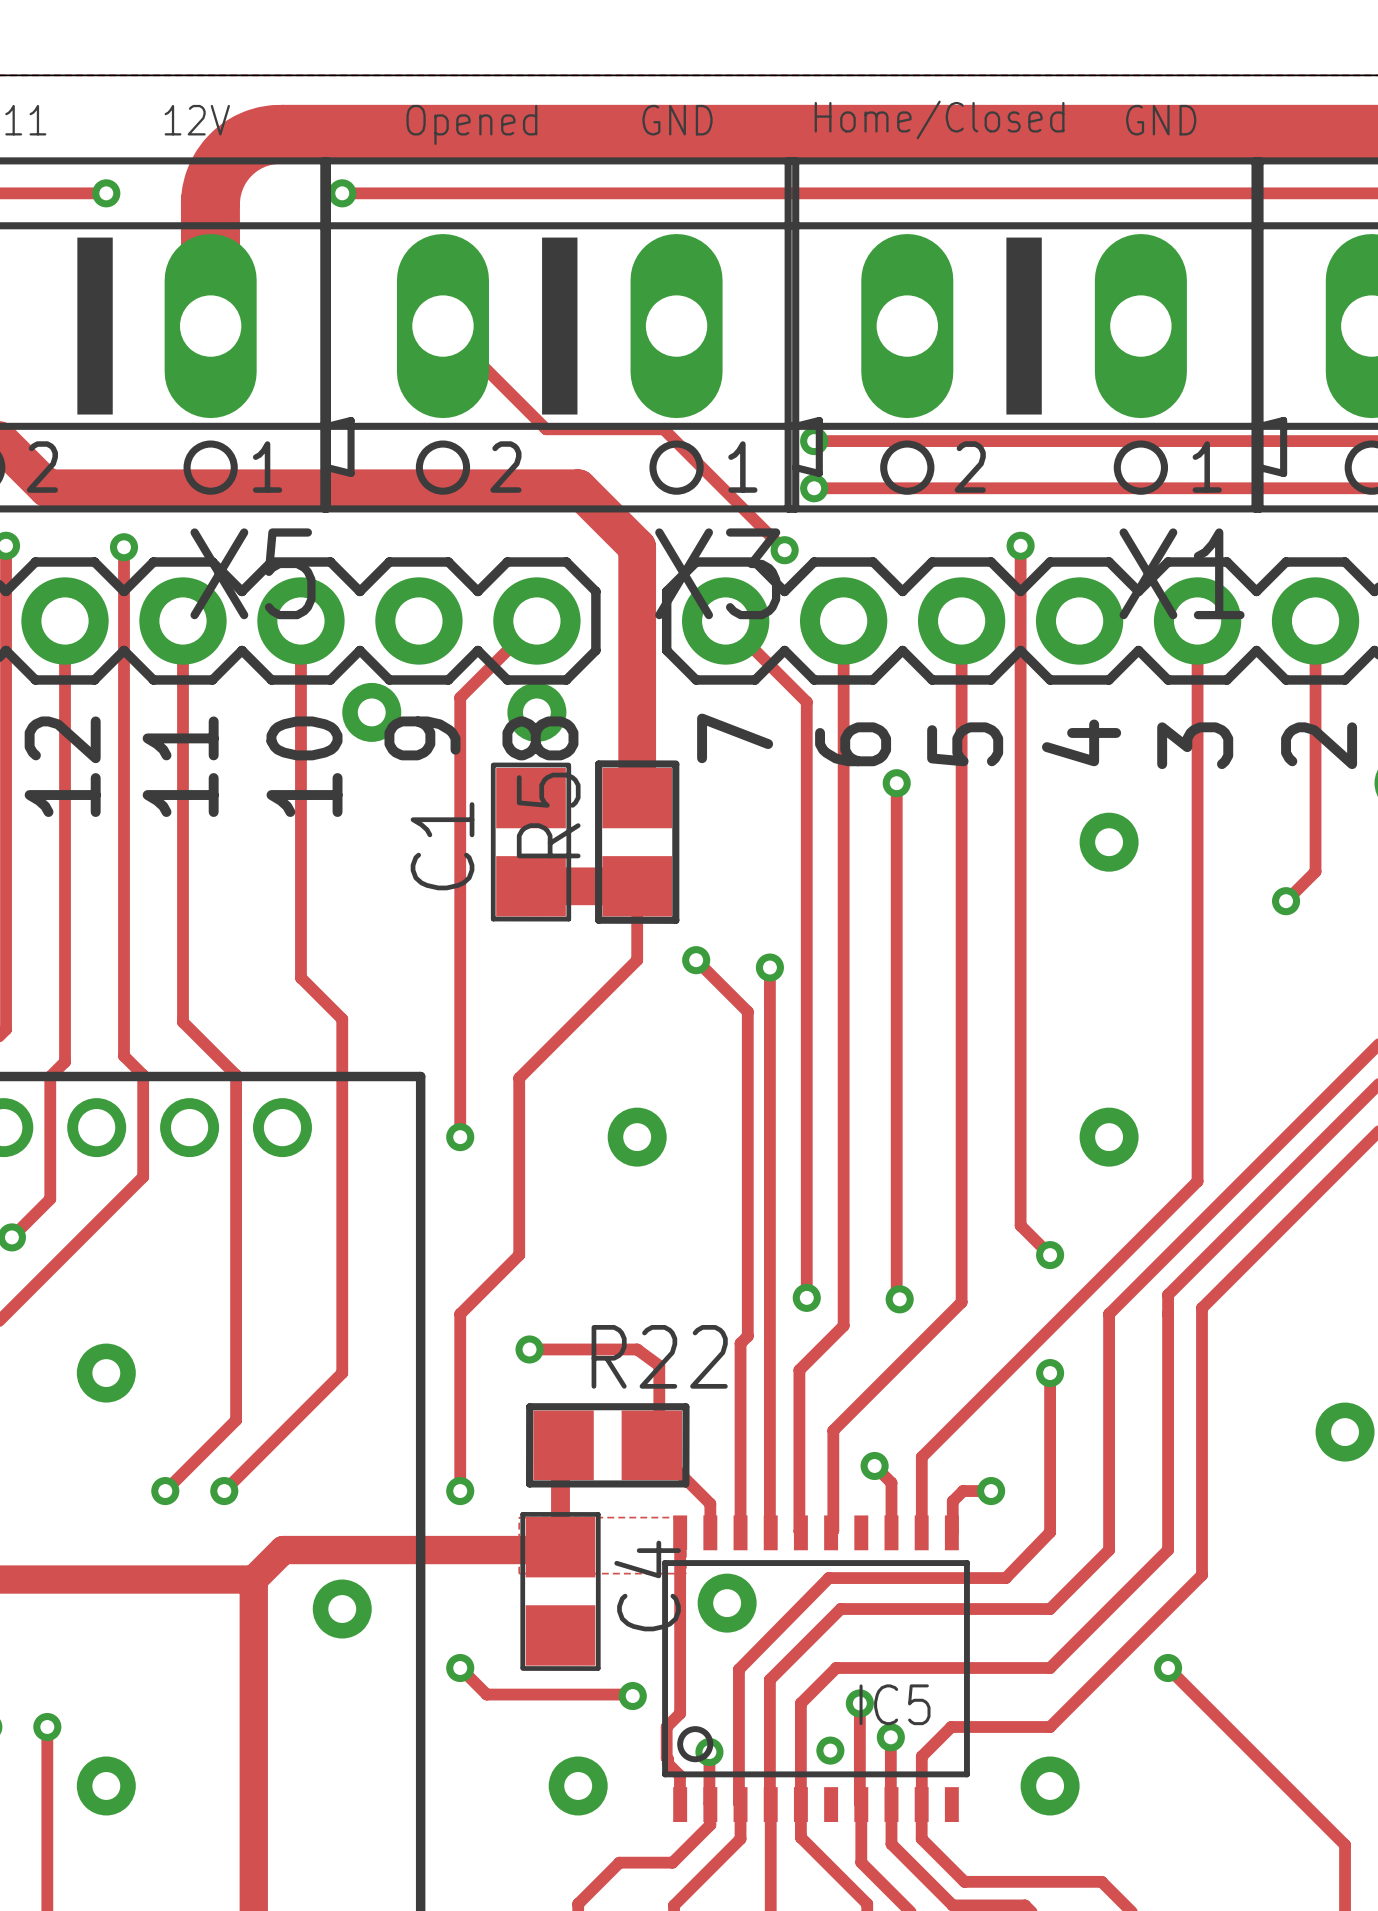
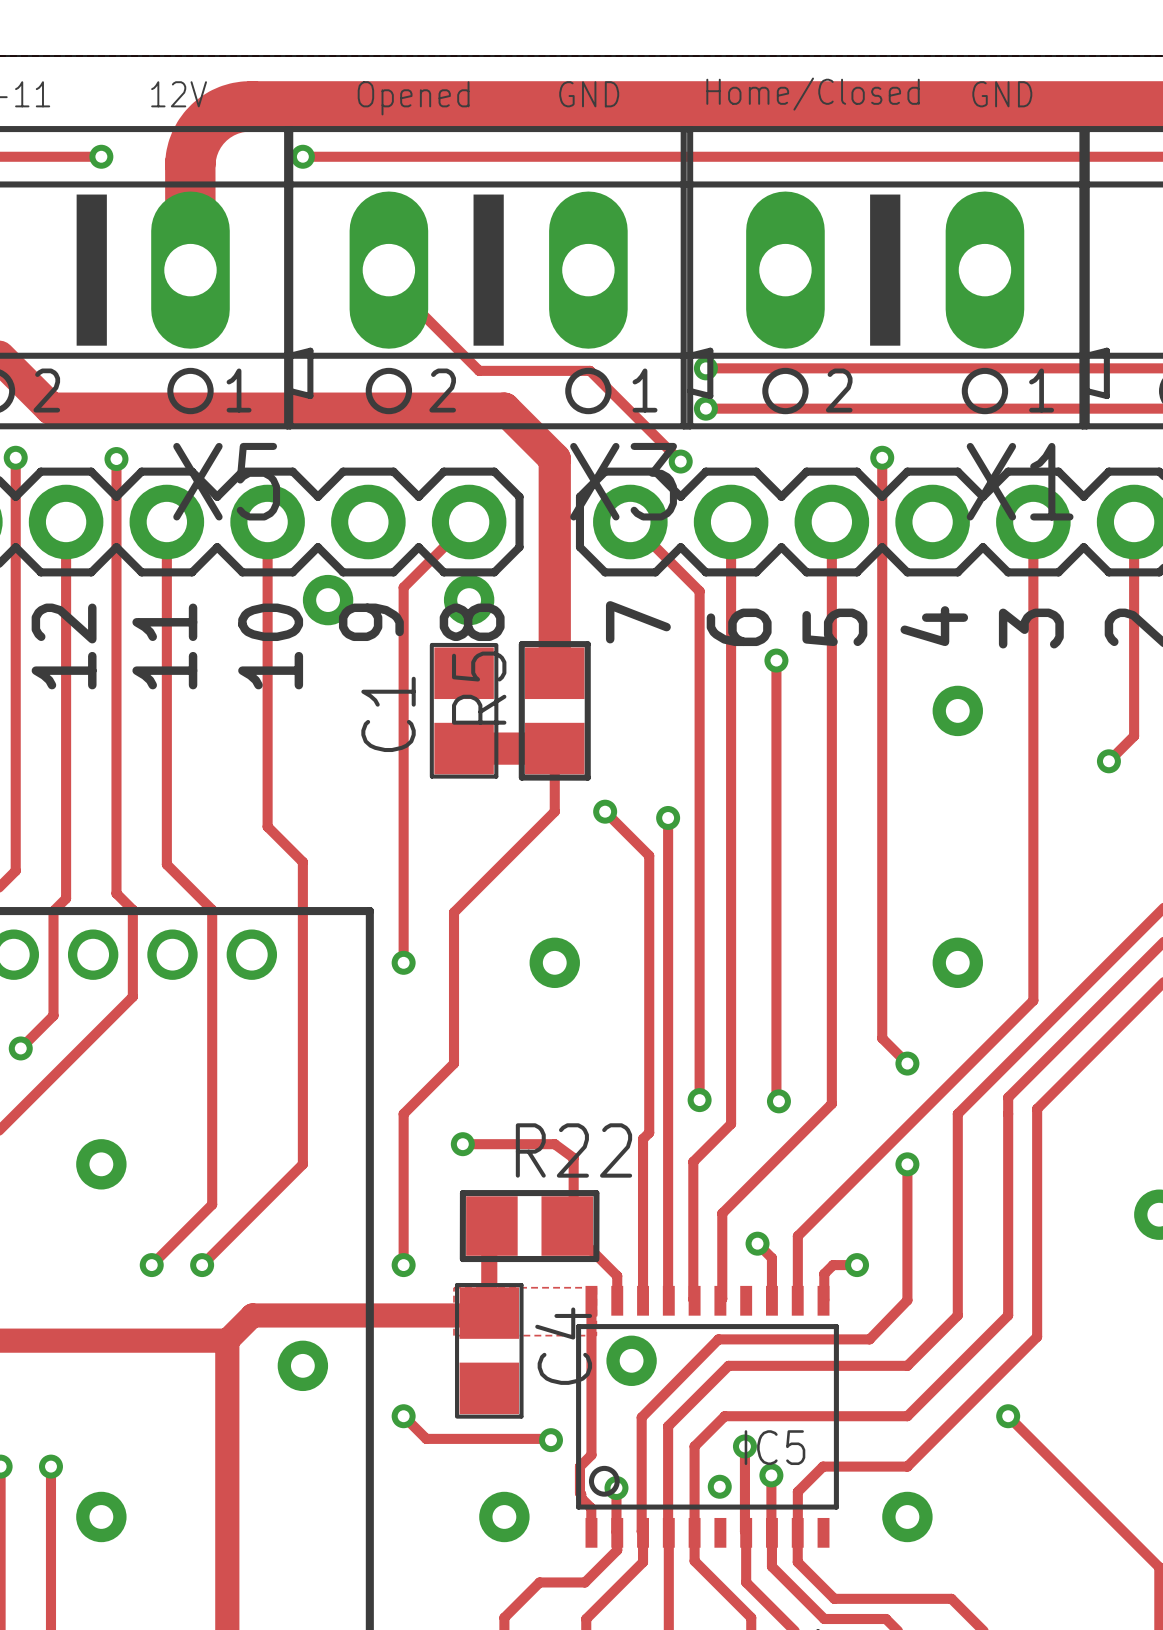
track: (442, 326) (546, 429) (663, 429) (678, 444) -> (388, 270) (388, 280) (479, 370) (590, 370)

